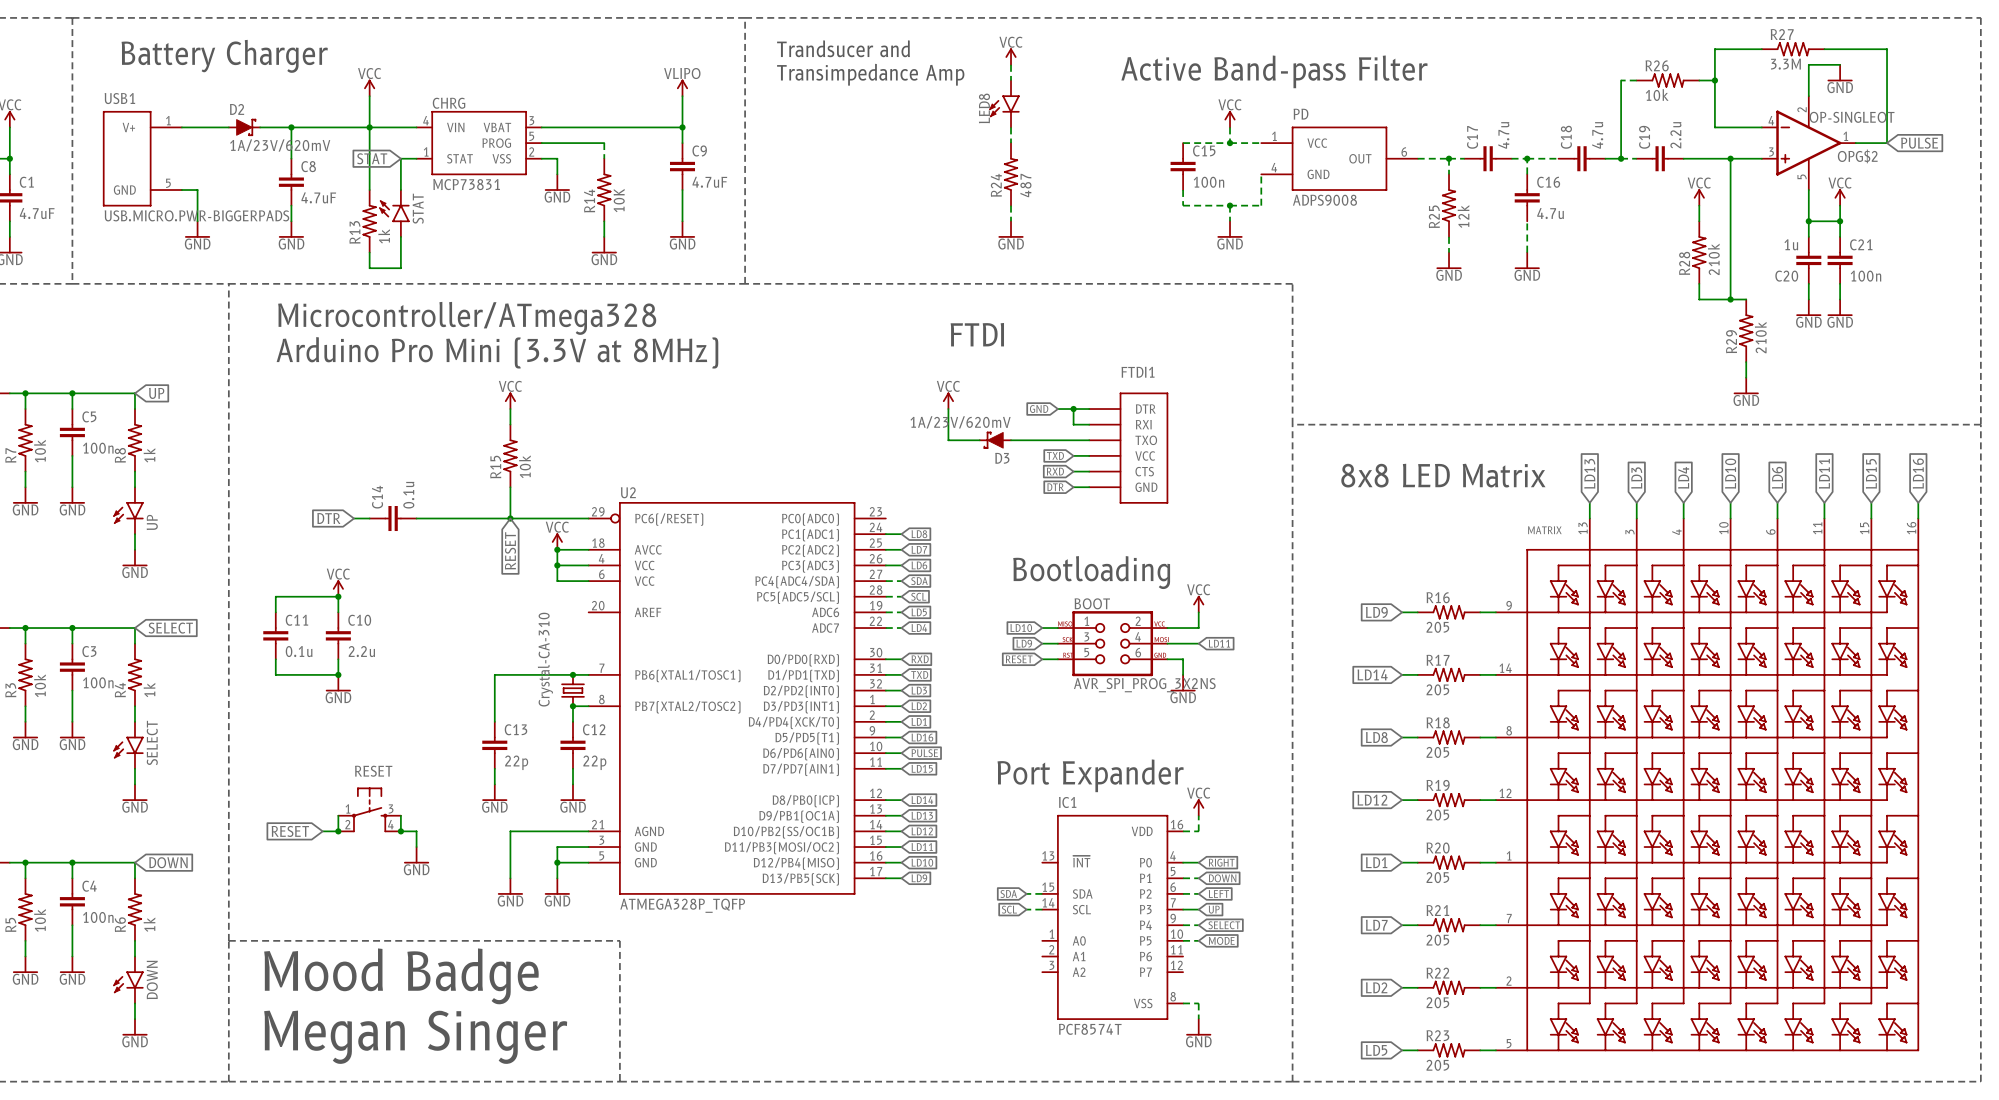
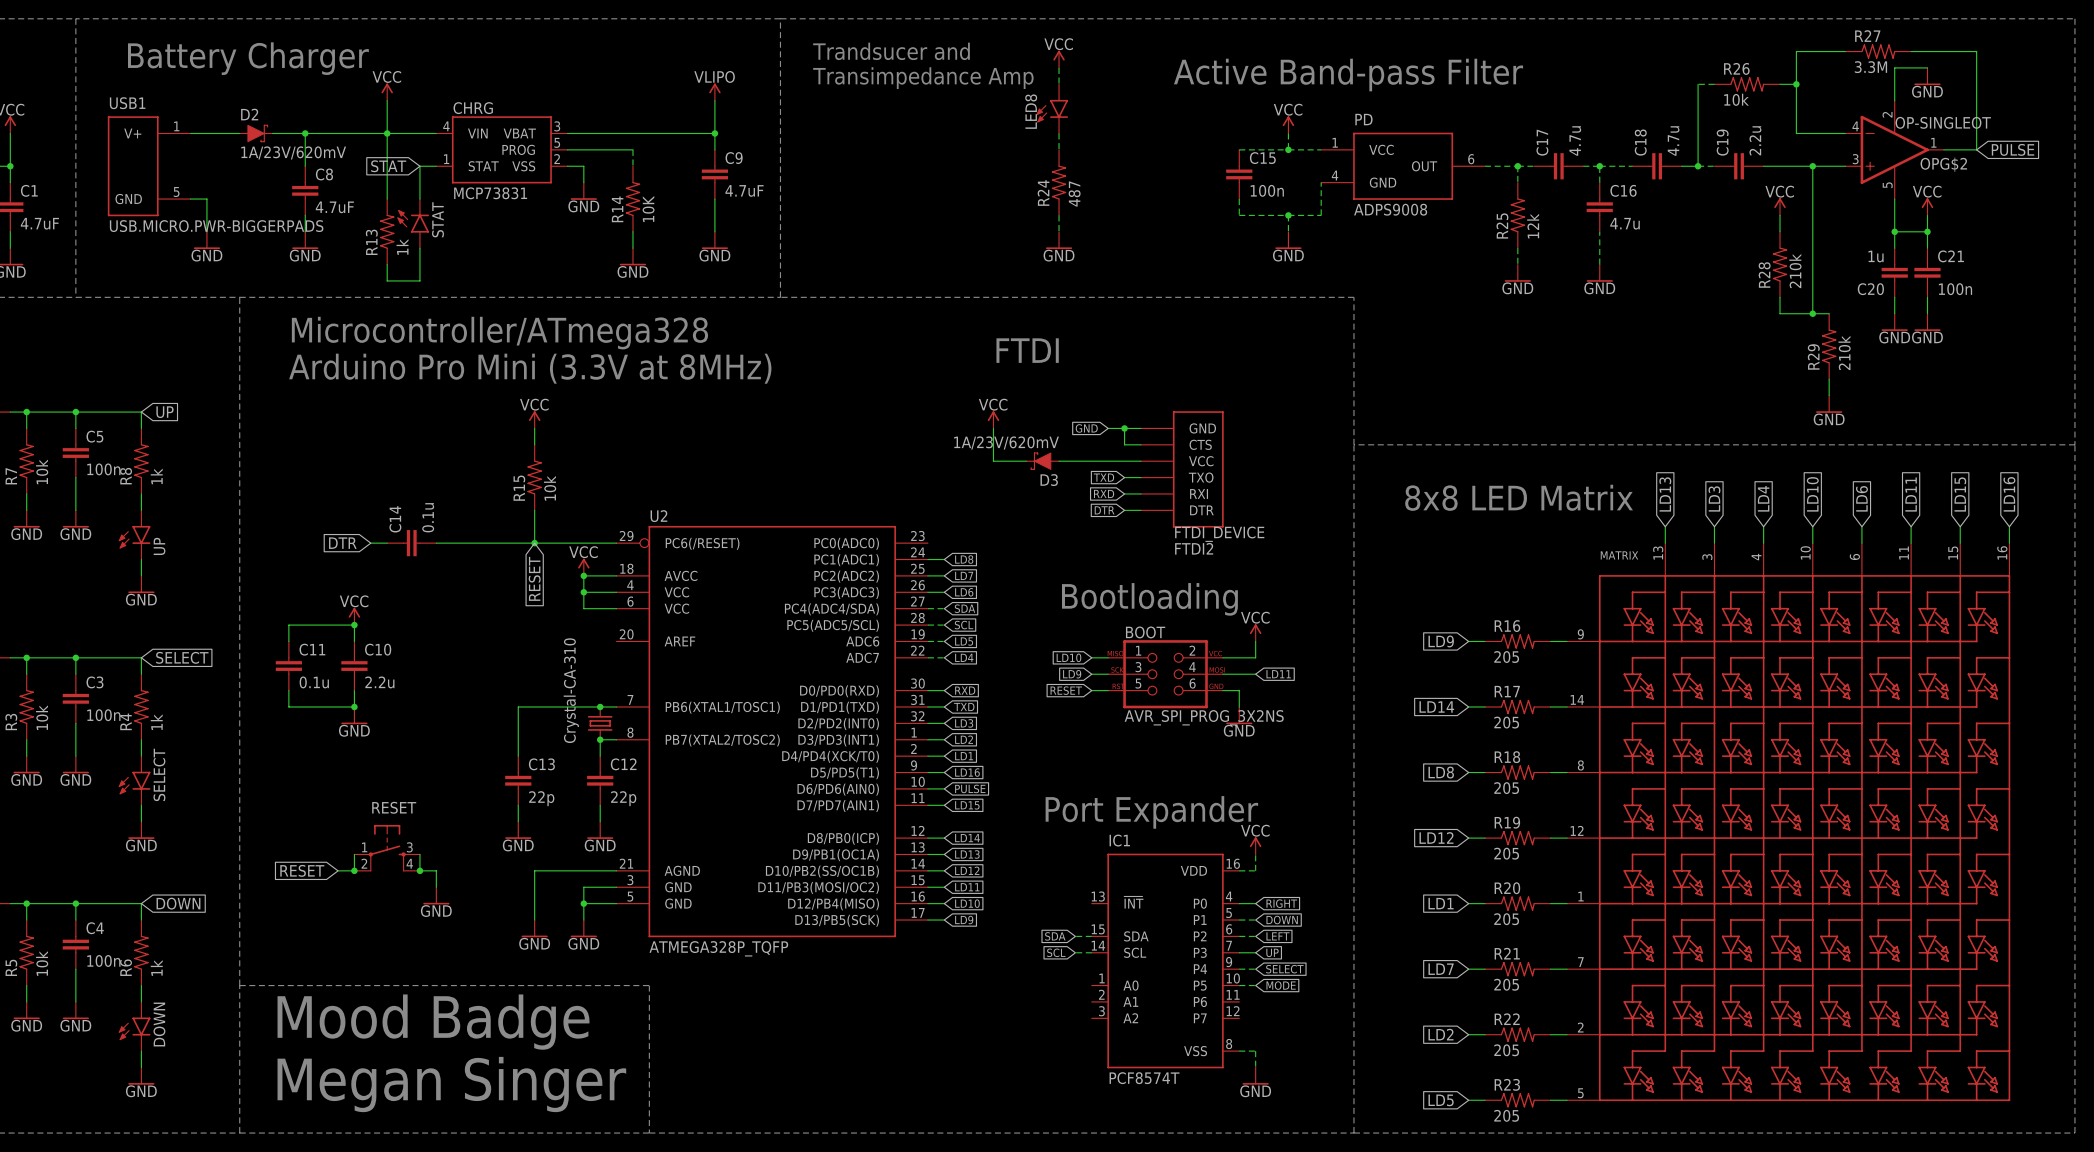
FTDI1 name: FTDI1 (1138, 372) -> FTDI2 (1194, 548)
FTDI1 flip: as is (1143, 448) -> up-down (1198, 469)
FTDI1 value: none -> FTDI_DEVICE (1219, 534)

